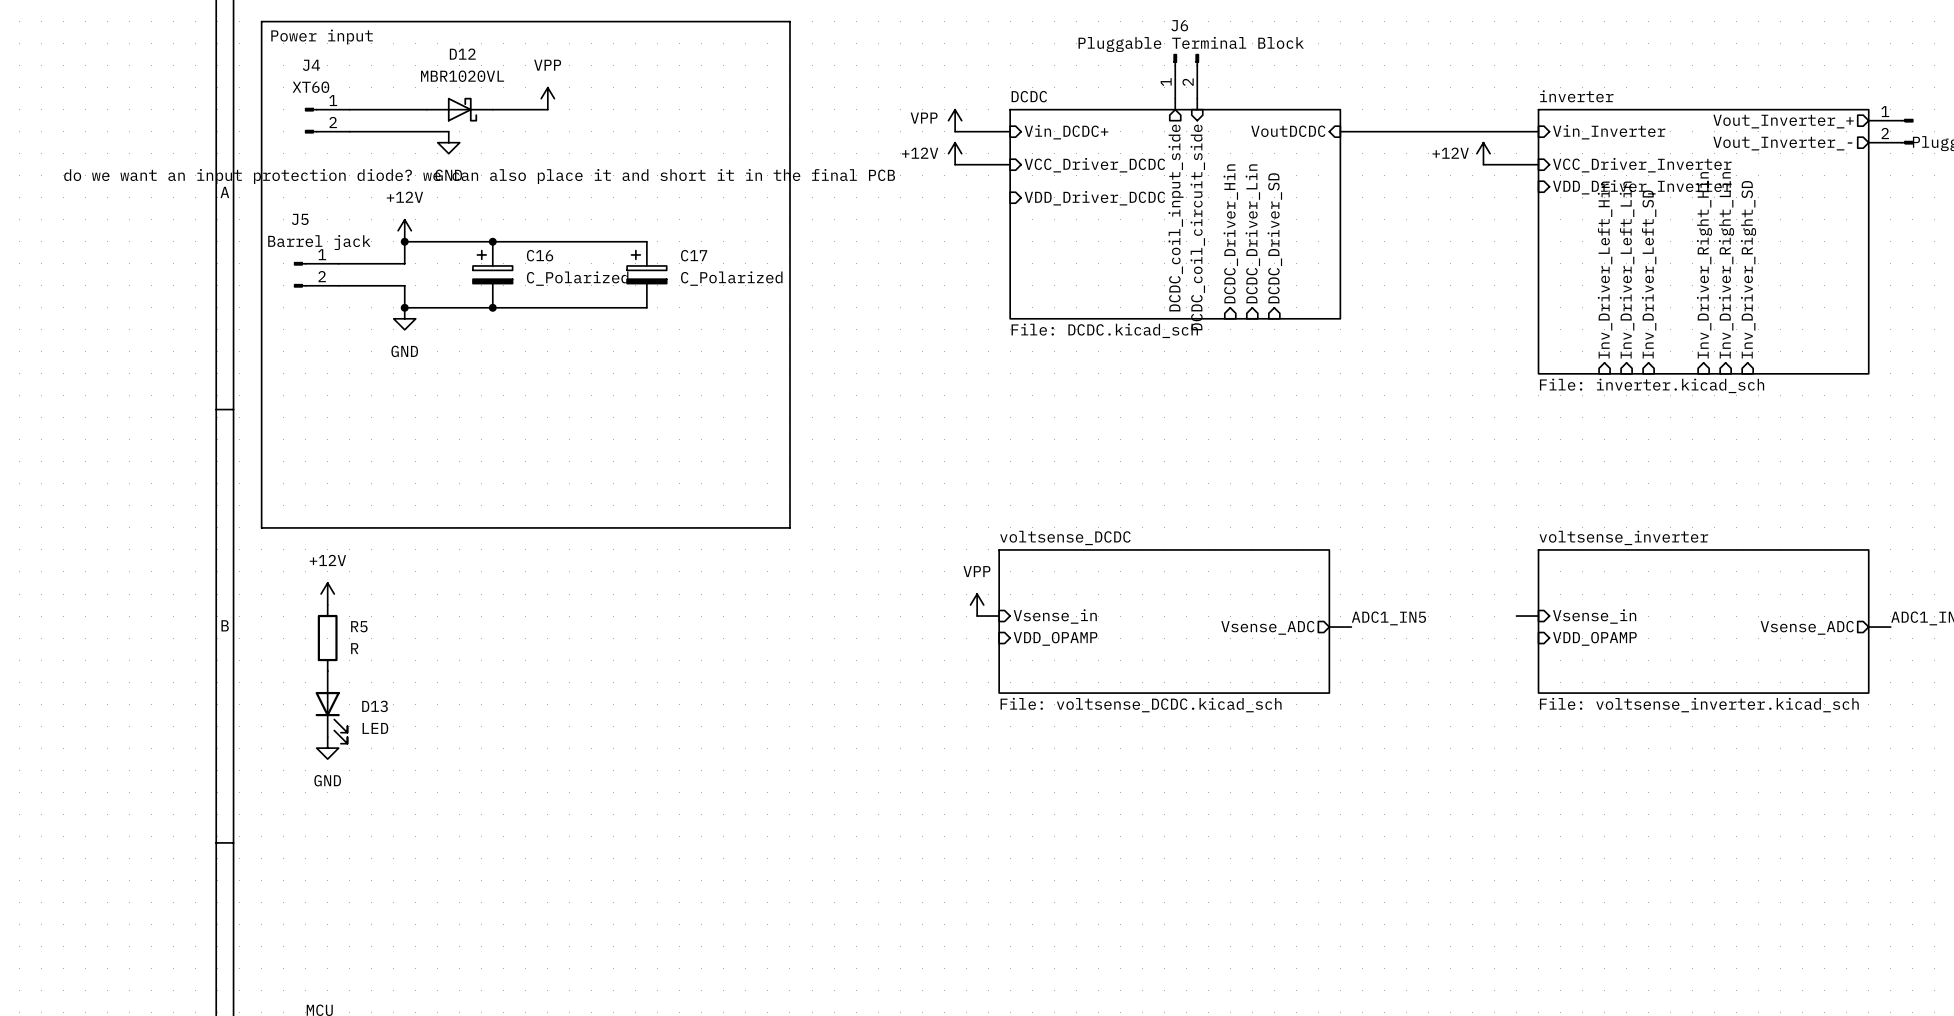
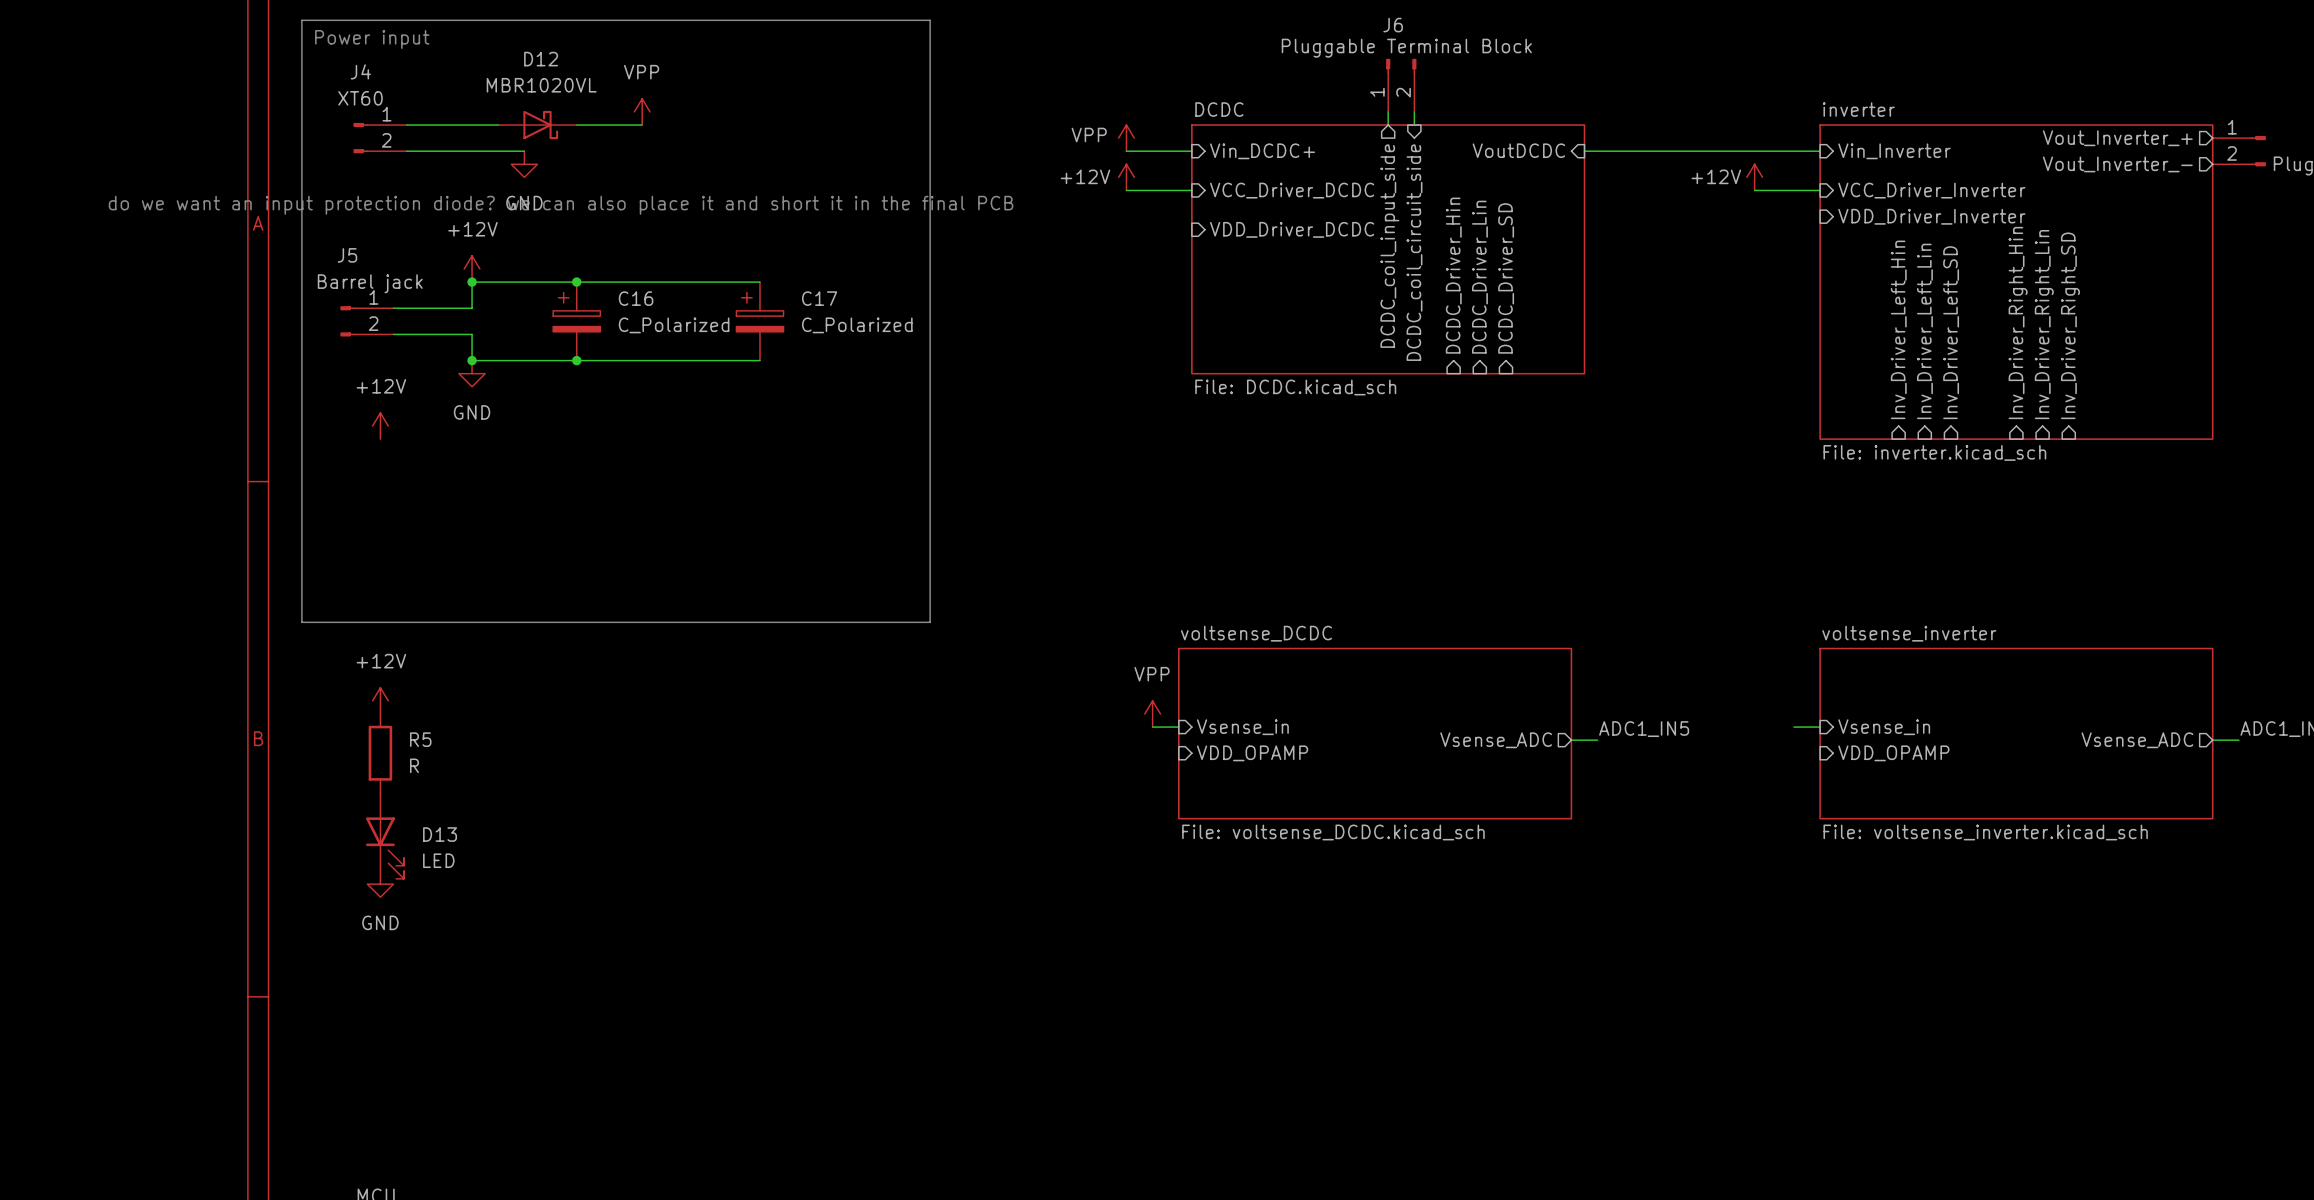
power symbol: none -> +12V (380, 426)

